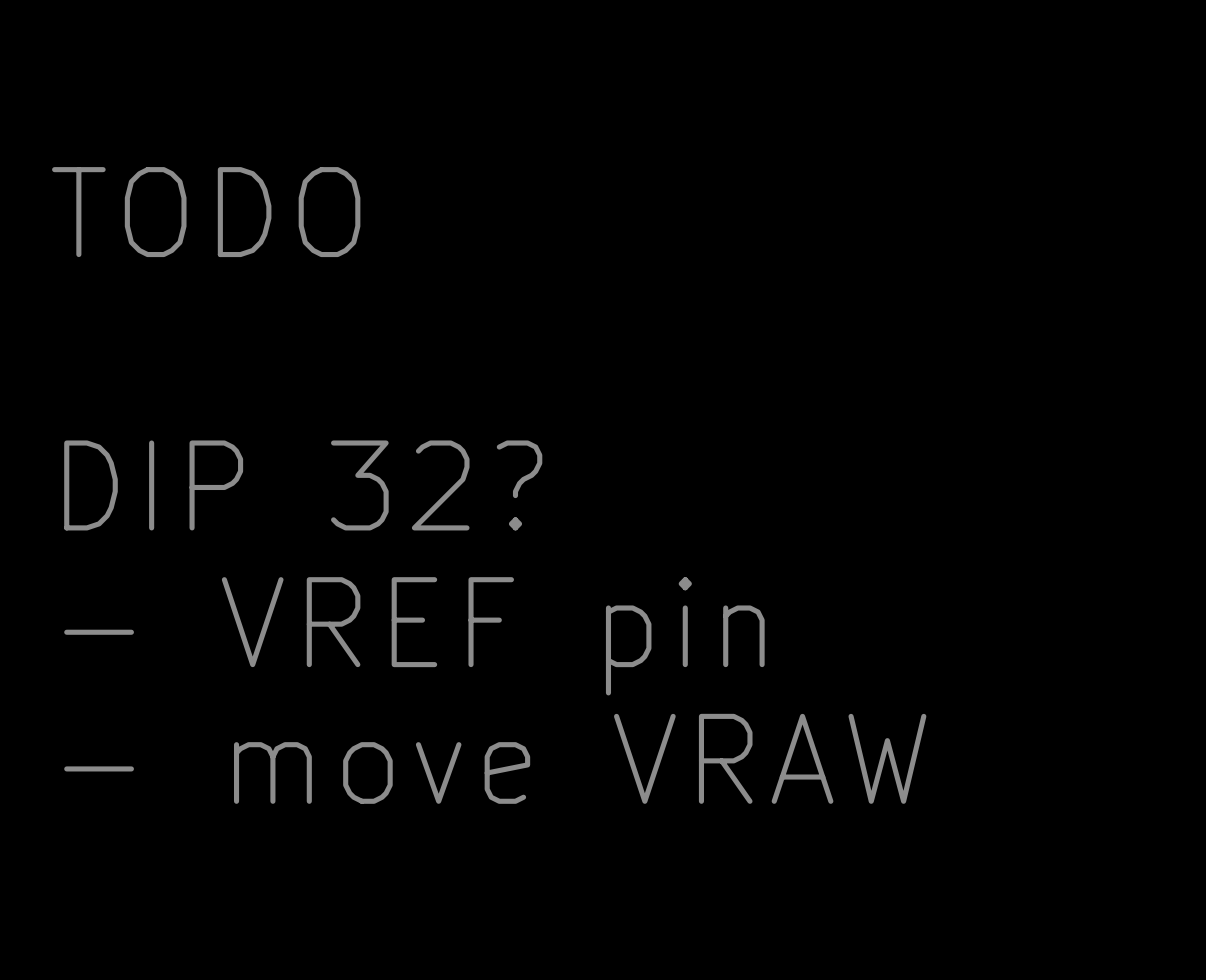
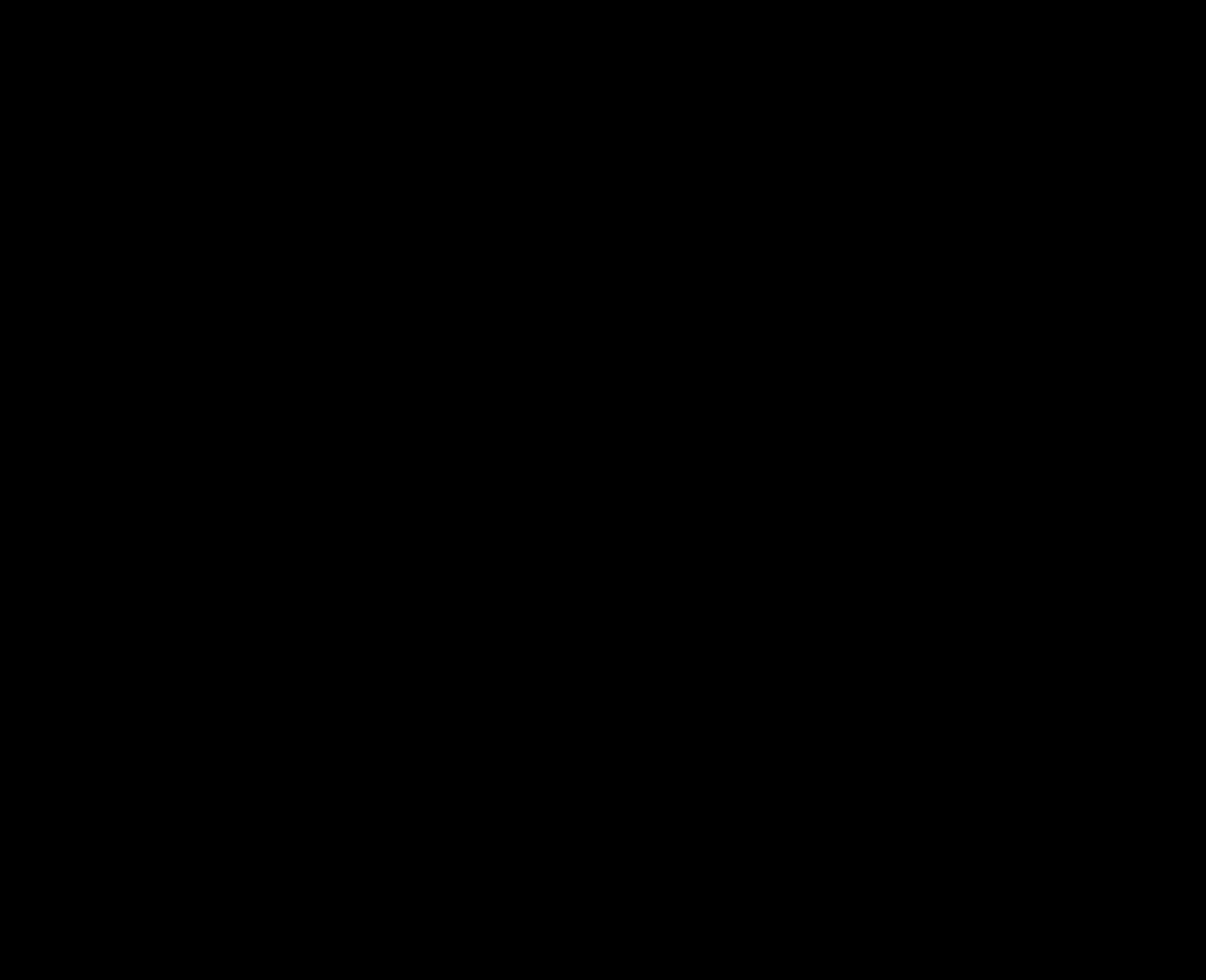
text: TODO (206, 212) -> none
text: DIP 32? (303, 485) -> none
text: - VREF pin (414, 636) -> none
text: - move VRAW (495, 758) -> none

